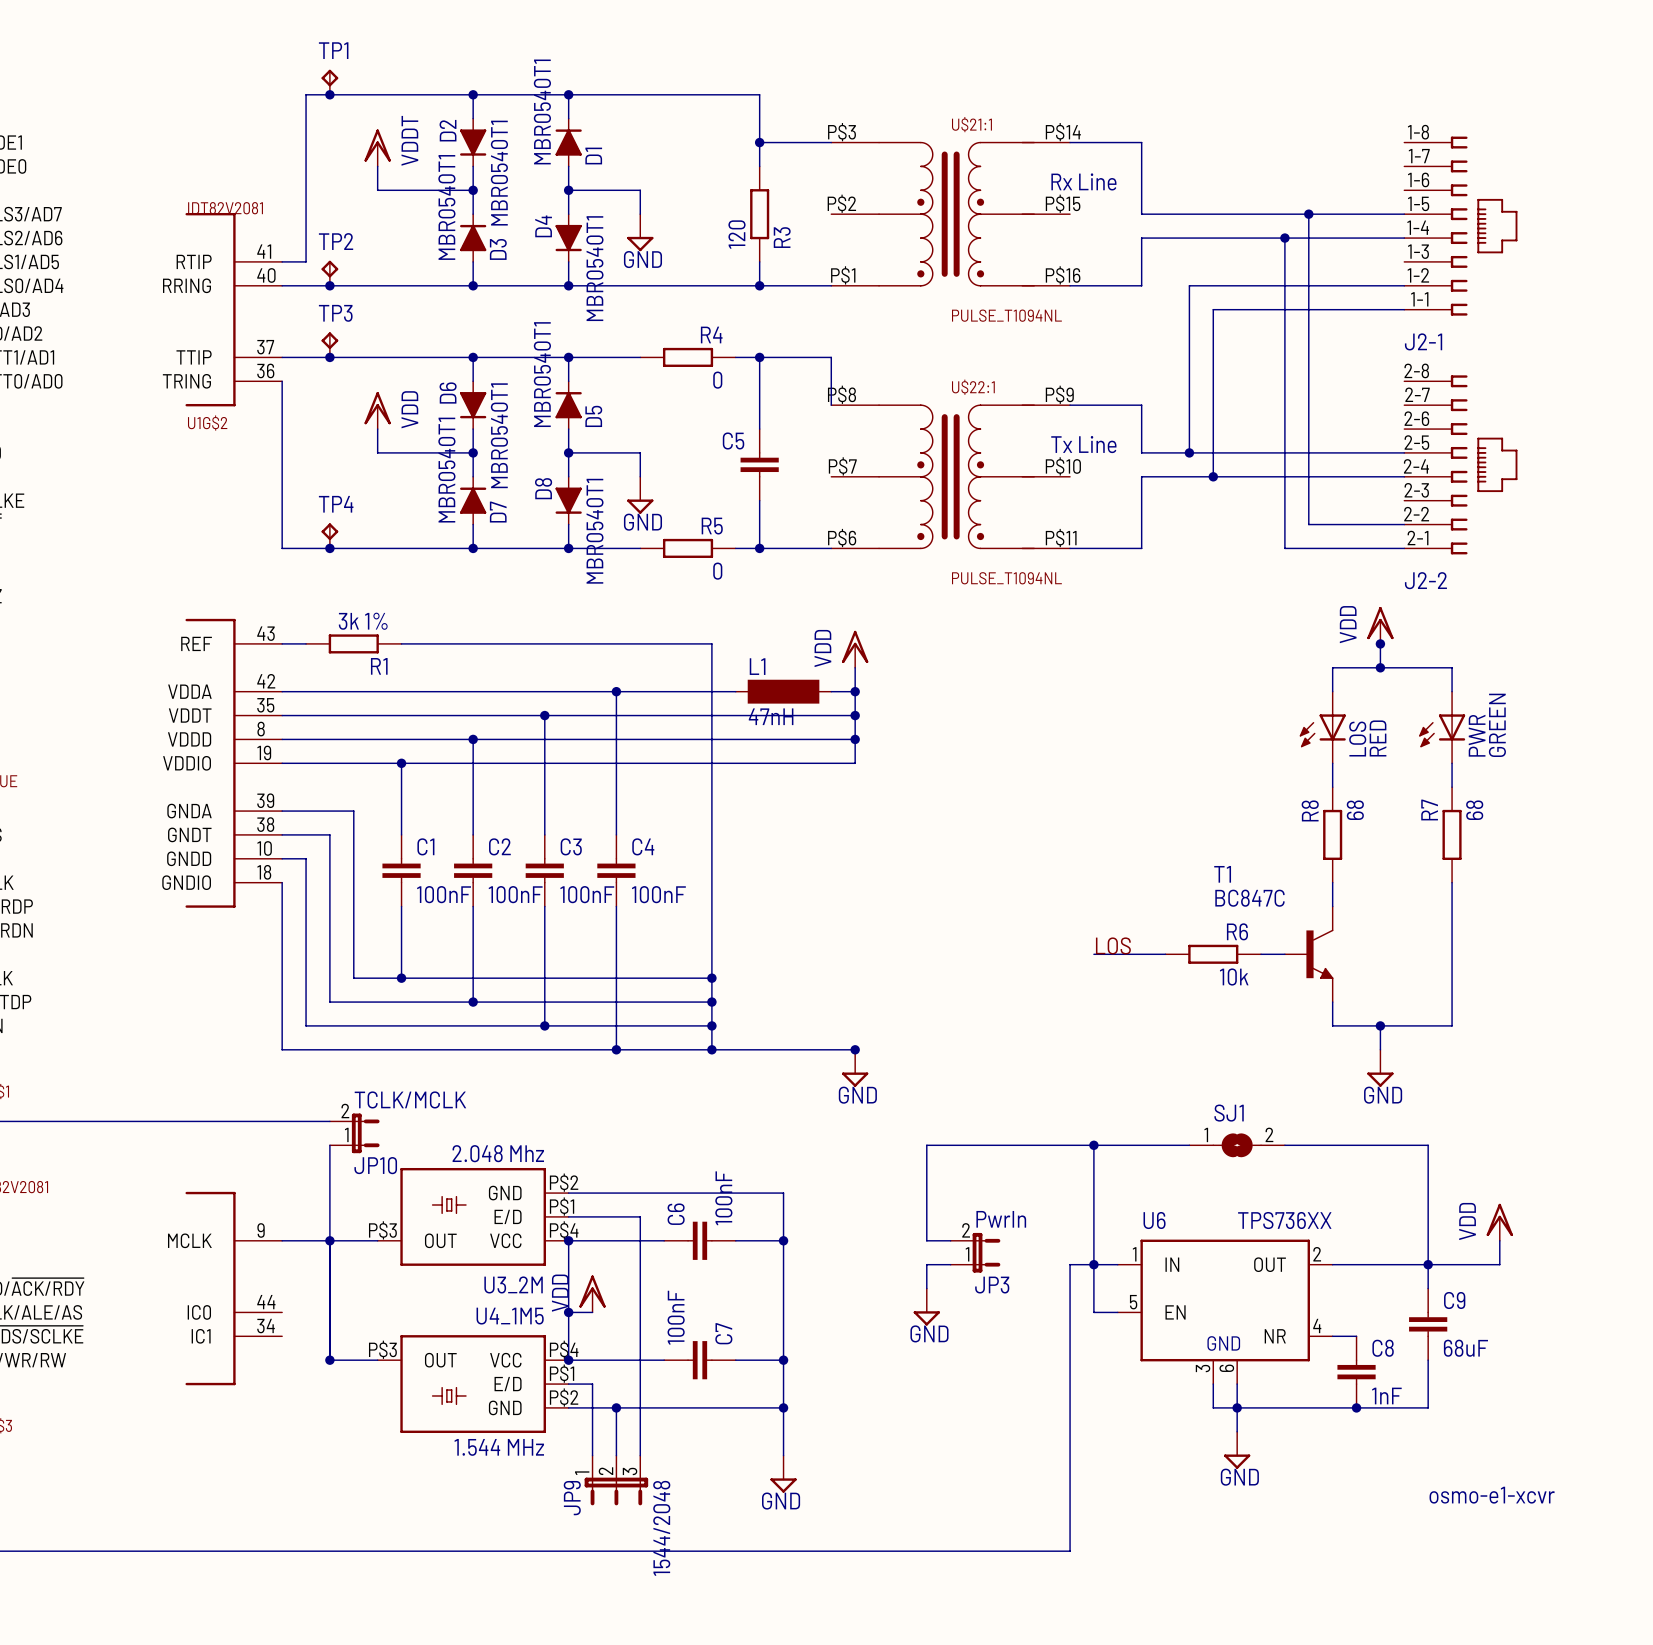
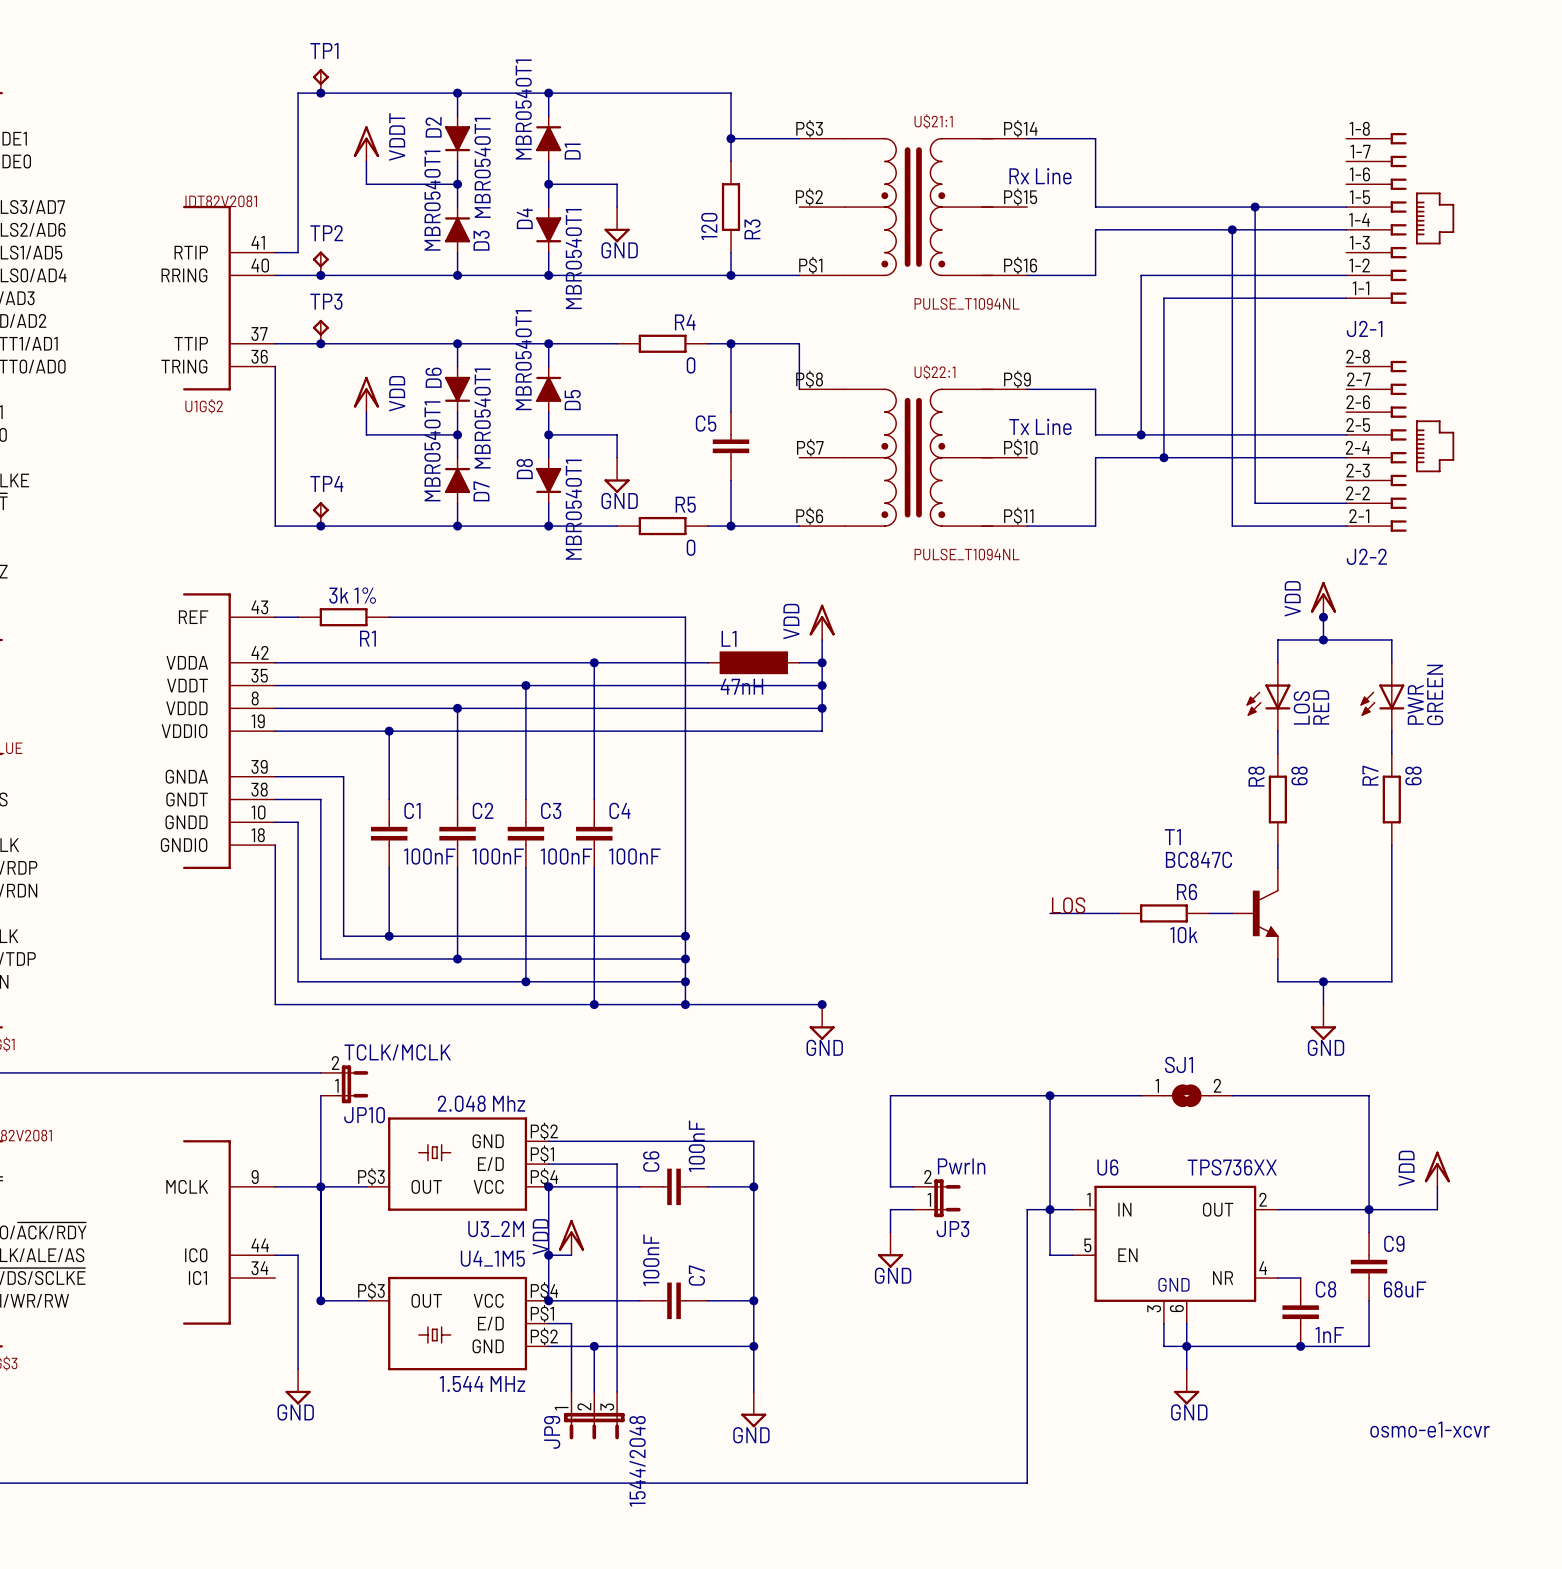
wire: none -> (275, 1255) (298, 1255) (298, 1369)
power symbol: none -> GND (298, 1386)

